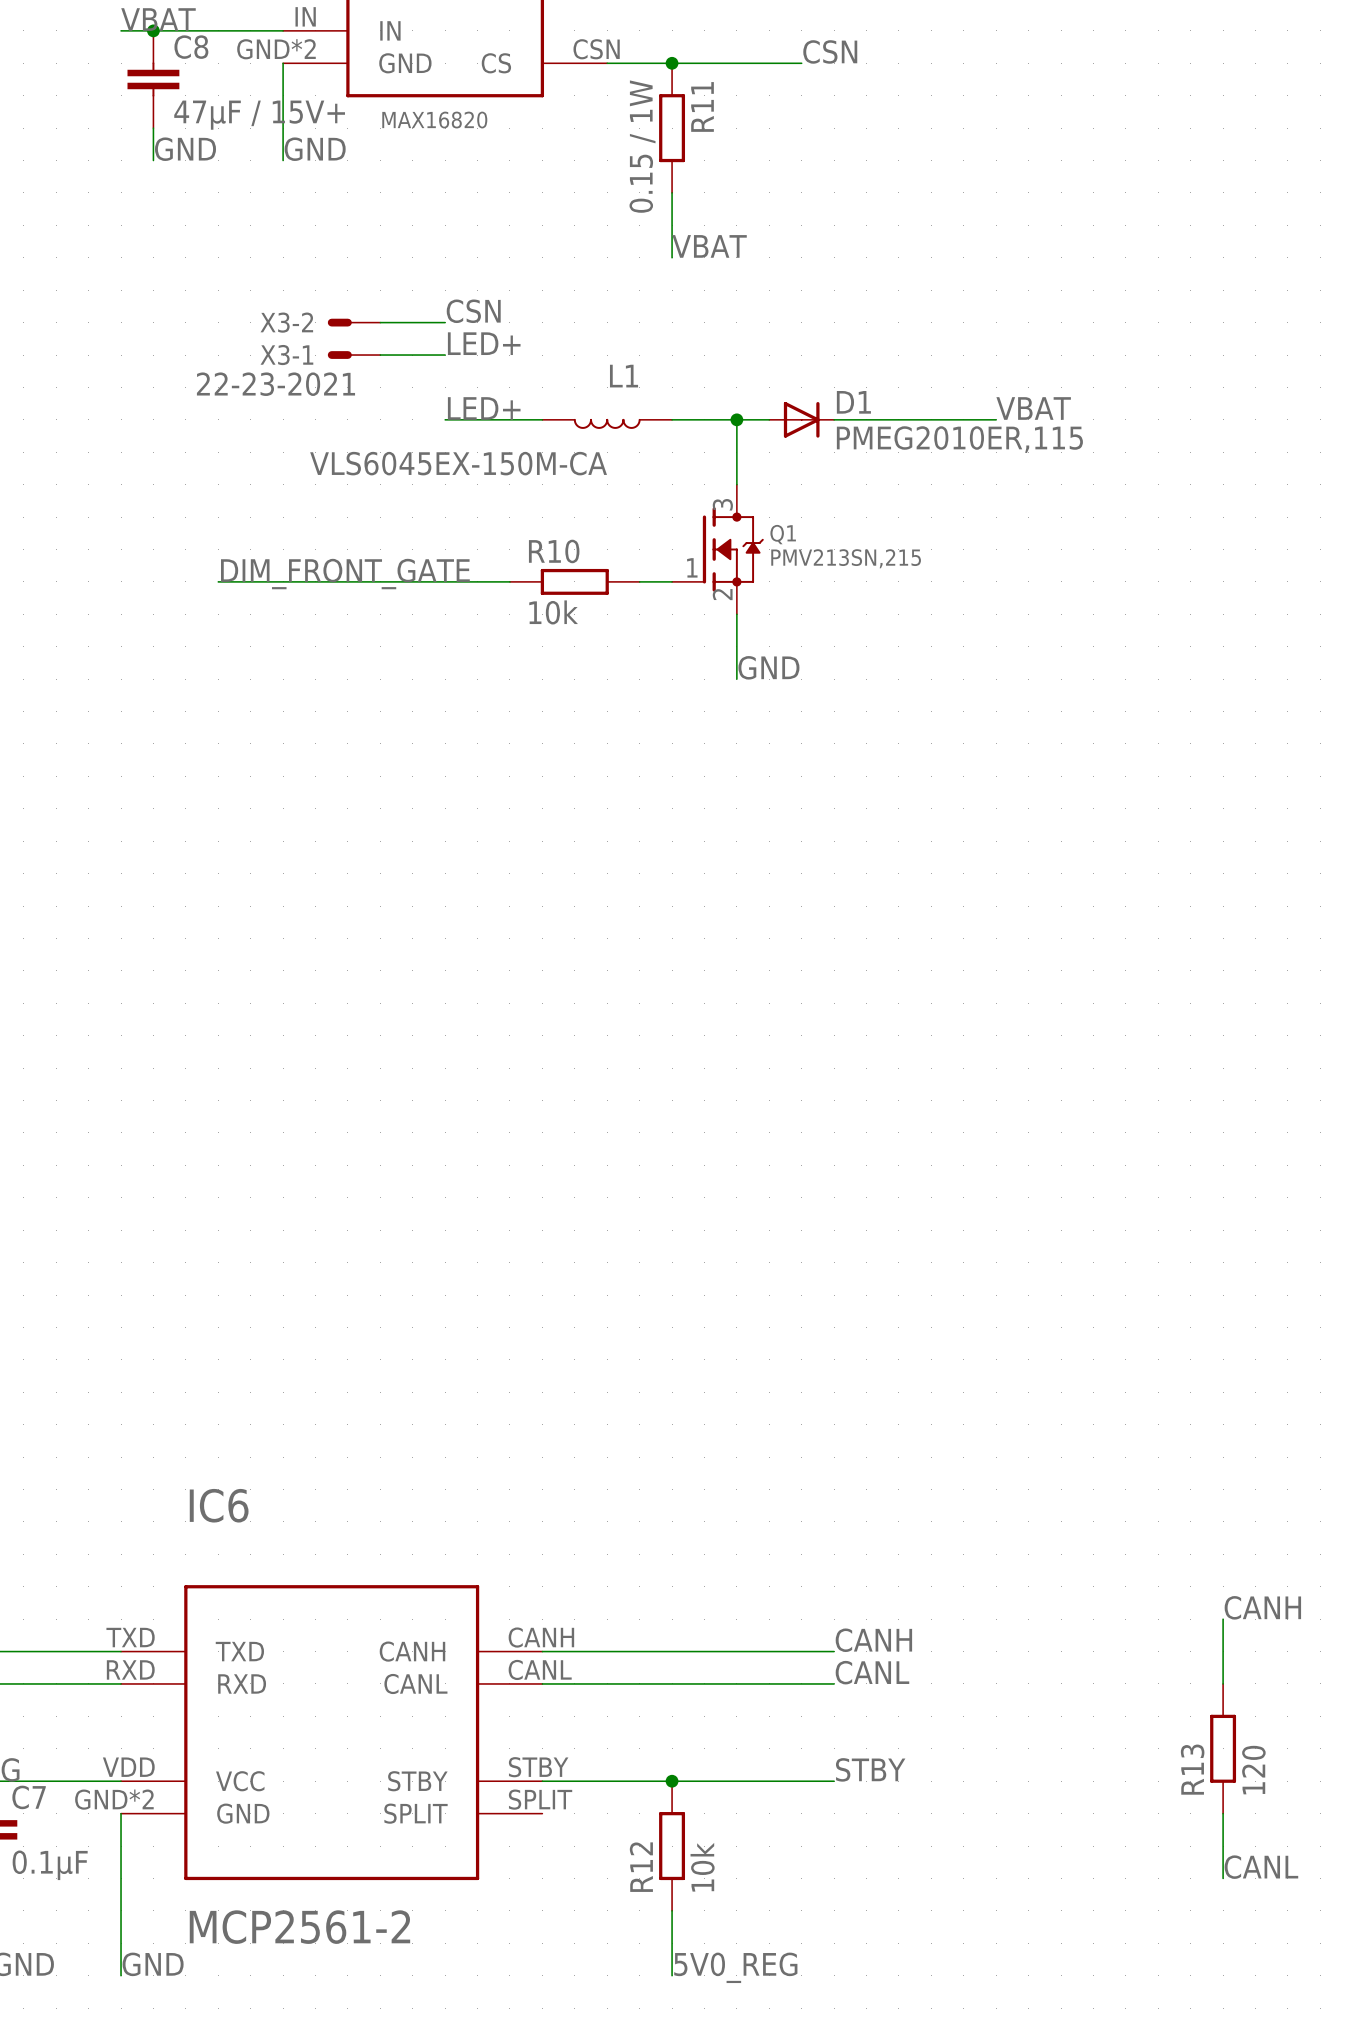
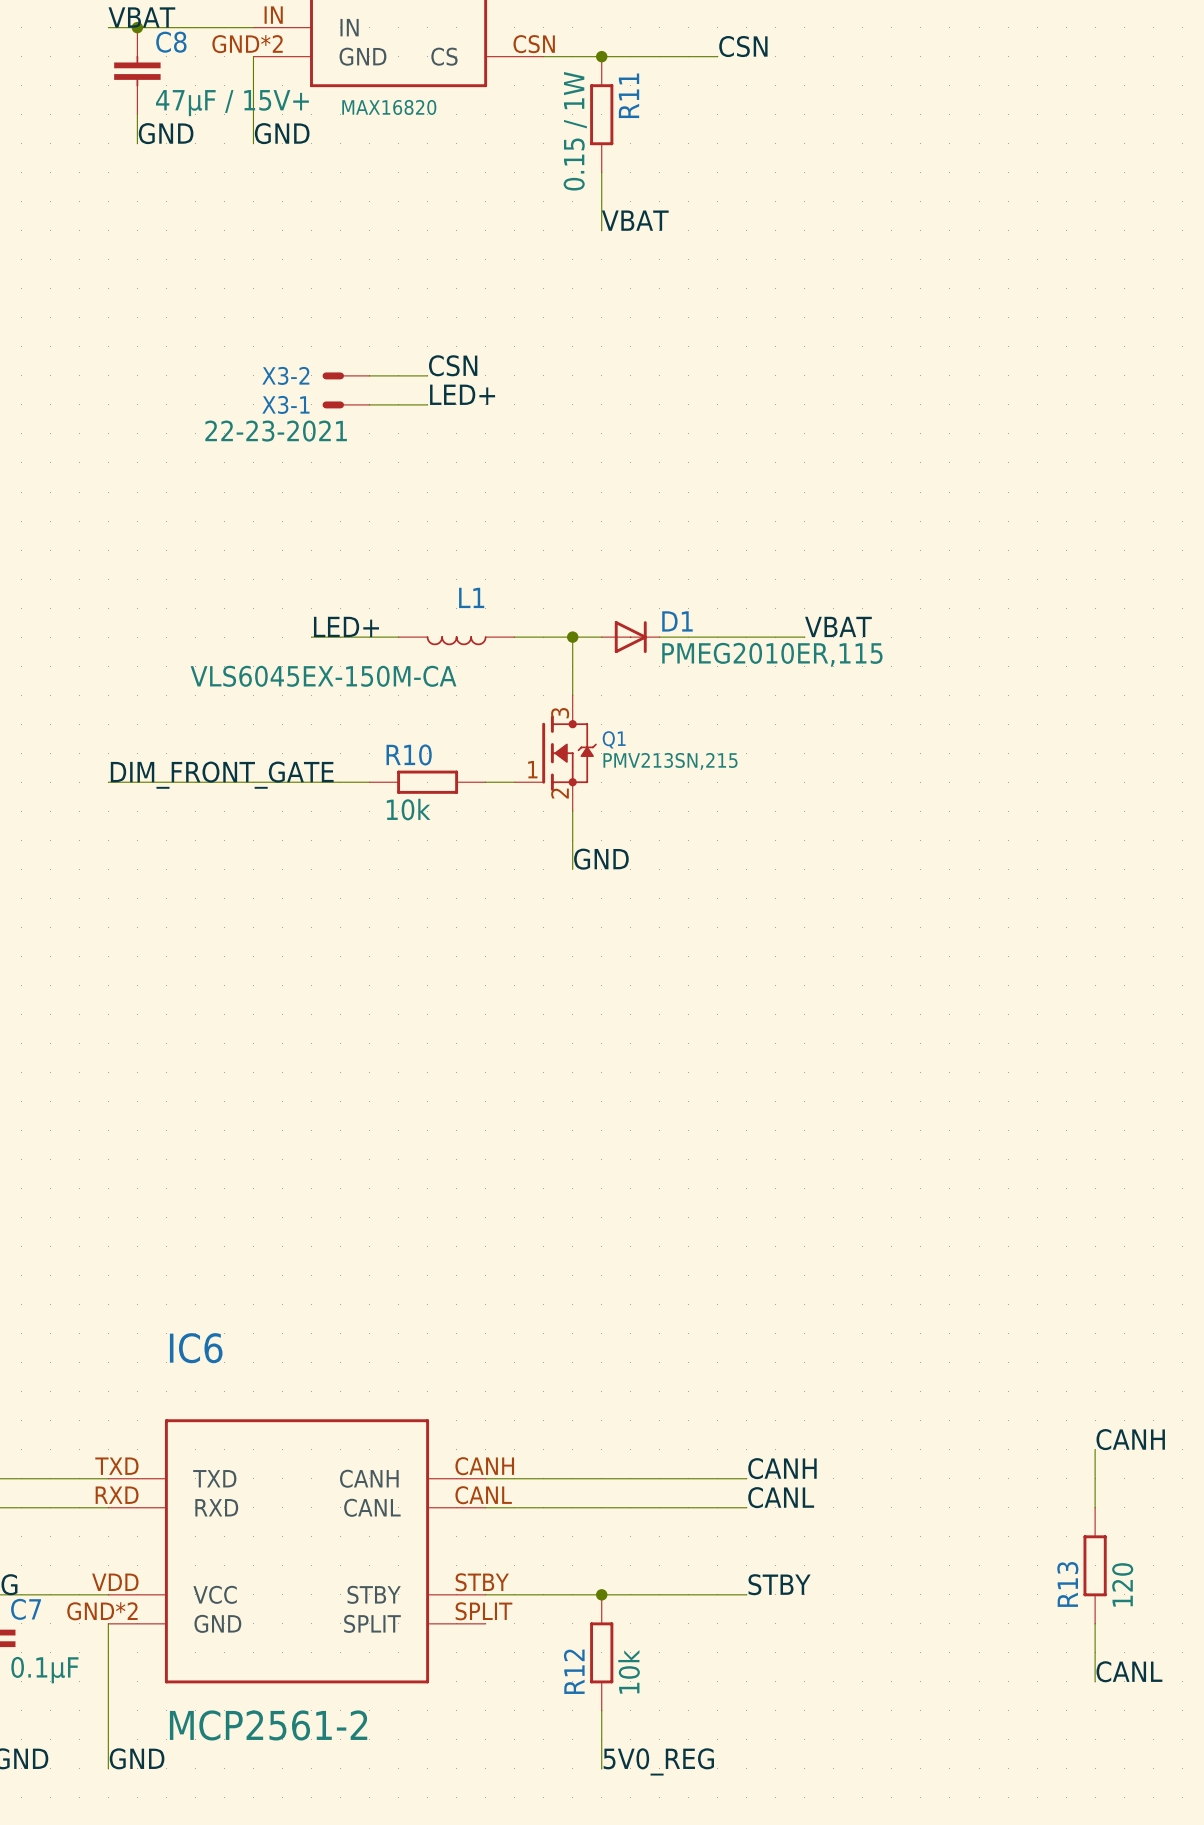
label position: CSN (473, 311) -> CSN (453, 365)
X3-2 position: (354, 322) -> (346, 375)
wire: (380, 322) (445, 322) -> none
label: LED+ (484, 343) -> none
X3-1 position: (354, 355) -> (346, 404)
wire: (380, 355) (445, 355) -> none
label position: LED+ (484, 408) -> LED+ (462, 394)
label position: VBAT (1033, 408) -> VBAT (838, 626)
wire: none -> (369, 375) (398, 375)
wire: (477, 419) (542, 419) -> (369, 404) (427, 404)
wire: (672, 419) (769, 419) -> (514, 637) (601, 637)
wire: (736, 419) (736, 484) -> (572, 637) (572, 695)
junction: (736, 419) -> none
D1 position: (801, 419) -> (630, 637)
wire: (834, 419) (996, 419) -> (659, 637) (804, 637)
L1 position: (607, 423) -> (456, 640)
Q1 position: (717, 549) -> (555, 753)
label position: DIM_FRONT_GATE (345, 574) -> DIM_FRONT_GATE (222, 775)
wire: (218, 581) (509, 581) -> (108, 782) (369, 782)
R10 position: (574, 581) -> (427, 782)
wire: (639, 581) (672, 581) -> (485, 782) (514, 782)
wire: (736, 614) (736, 679) -> (572, 811) (572, 869)
label position: GND (768, 667) -> GND (601, 859)
label: none -> LED+ (346, 626)
wire: none -> (311, 637) (398, 637)
junction: none -> (572, 637)

